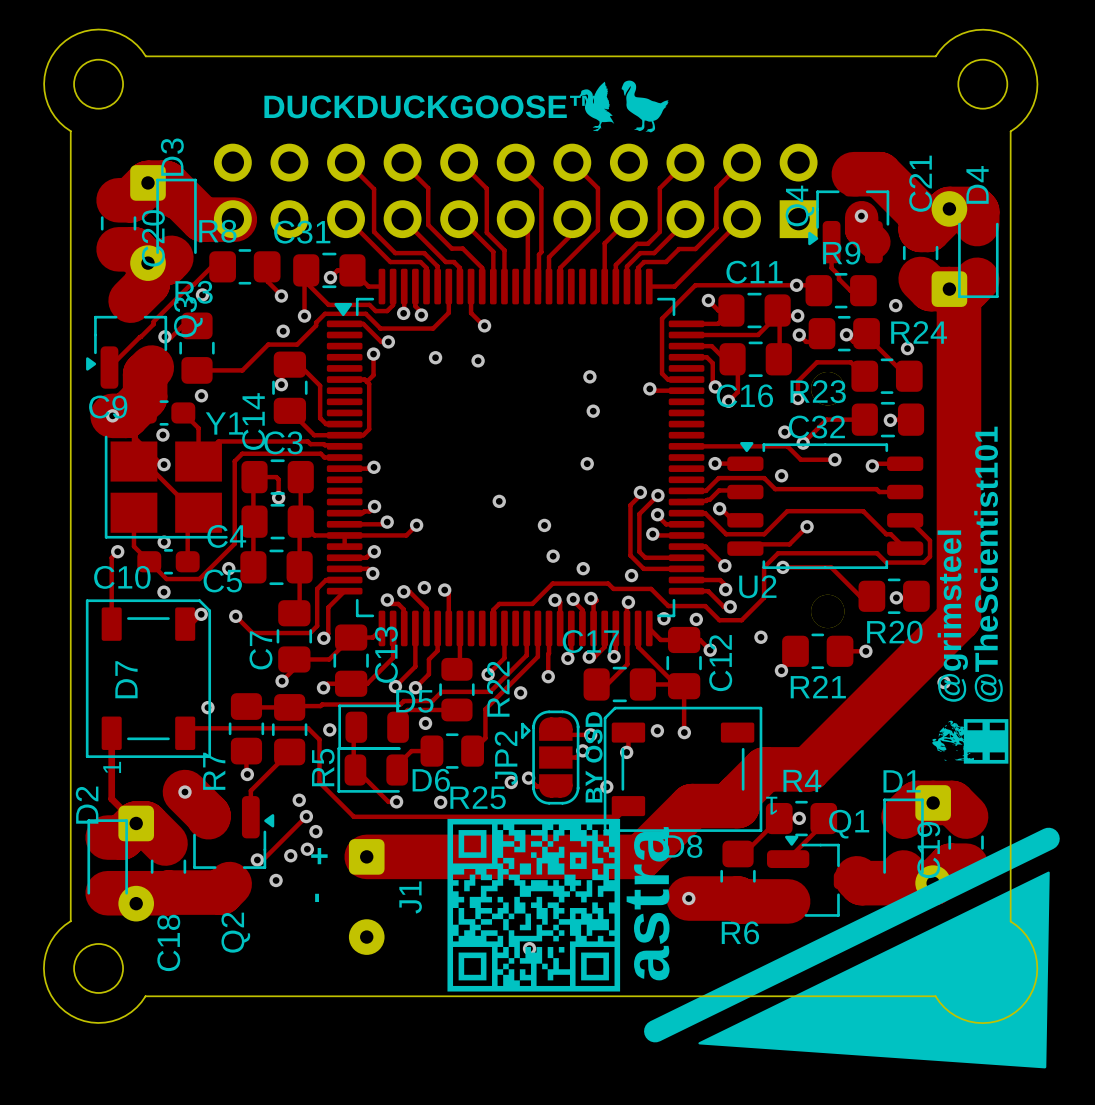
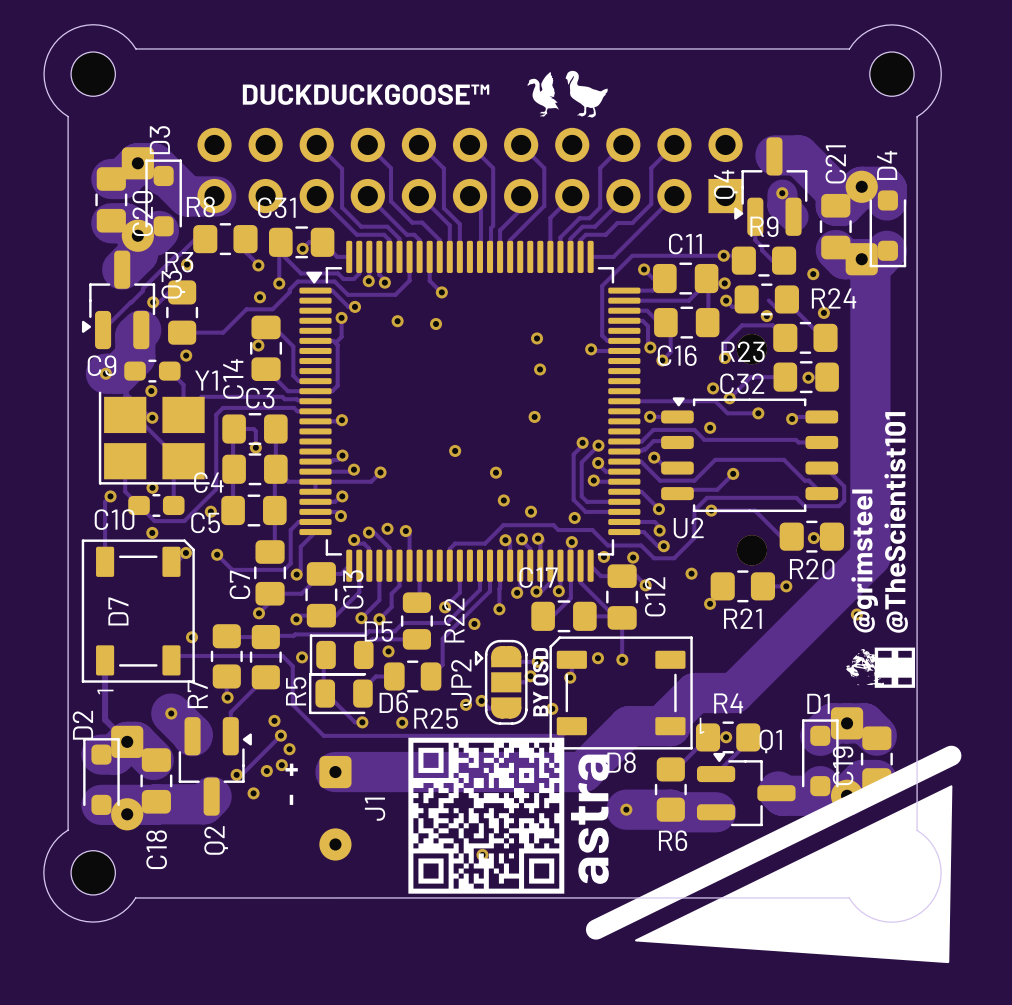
via position: (846, 334) -> (766, 316)

